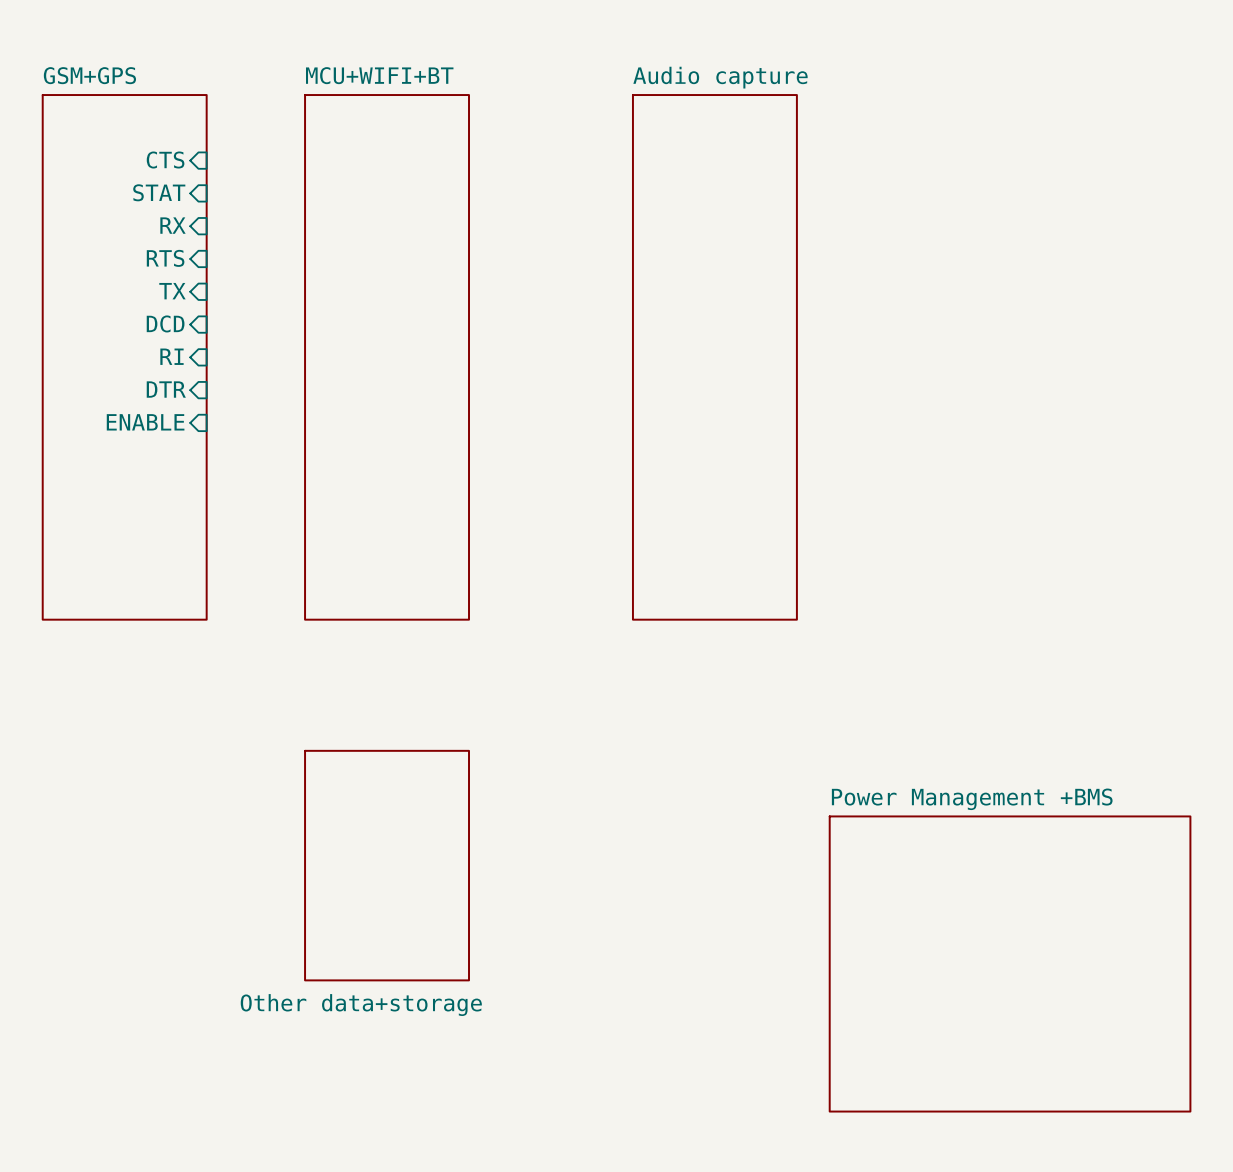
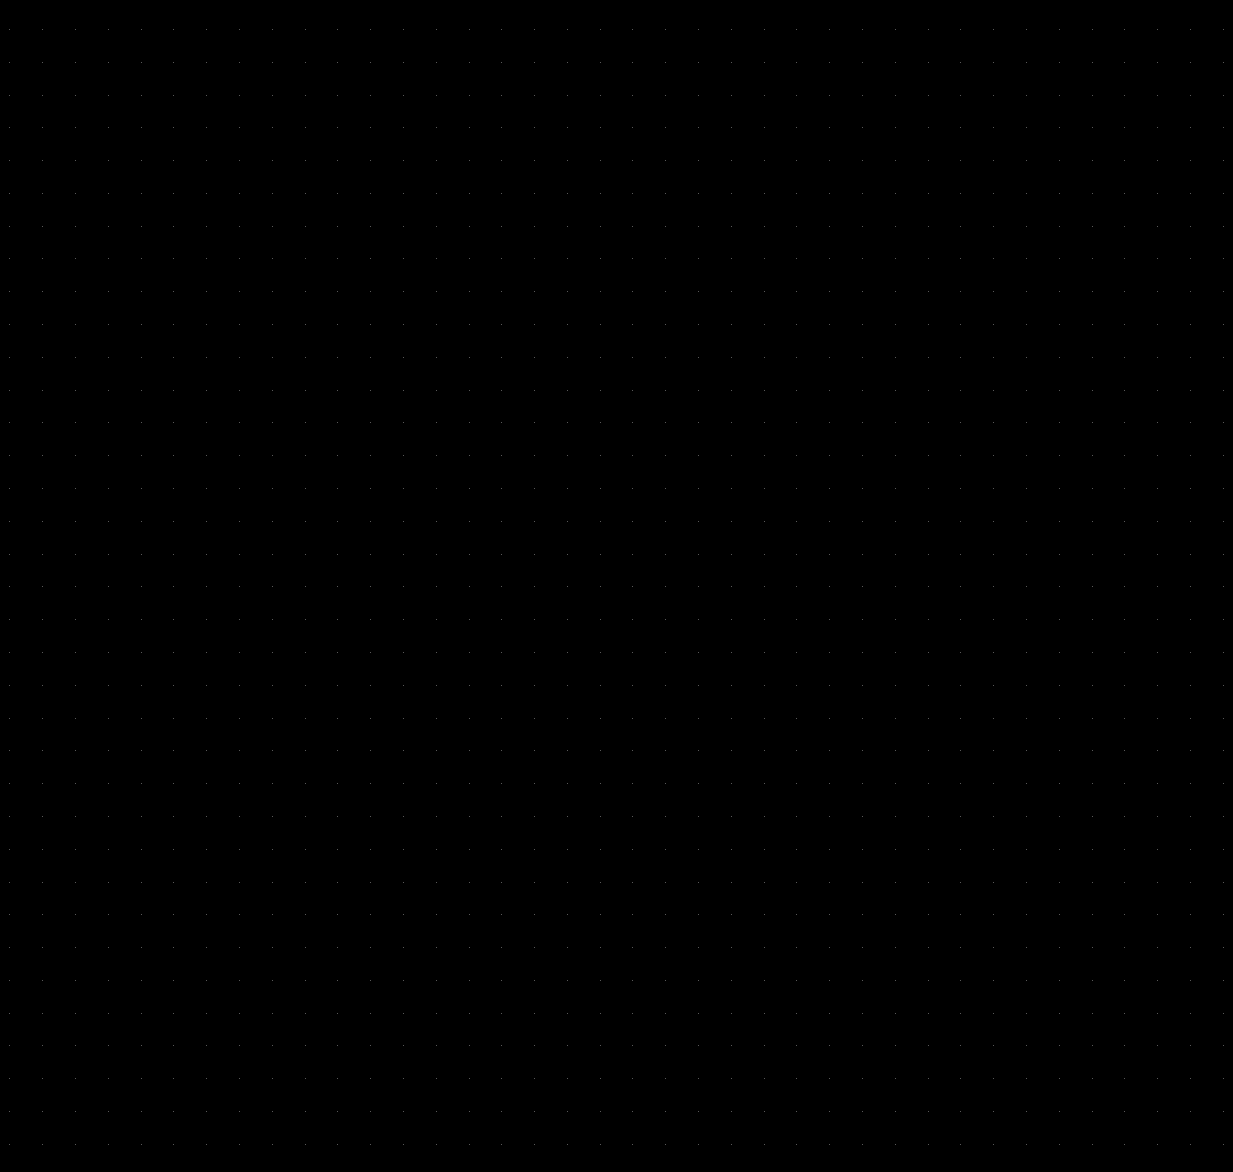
sheet pin: CTS (165, 160) -> none
sheet pin: STAT (159, 192) -> none
sheet pin: RX (172, 225) -> none
sheet pin: RTS (165, 258) -> none
sheet pin: TX (172, 291) -> none
sheet pin: DCD (165, 323) -> none
sheet pin: RI (171, 356) -> none
sheet GSM+GPS: (124, 357) -> none
sheet MCU+WIFI+BT: (387, 357) -> none
sheet Audio capture: (714, 357) -> none
sheet pin: DTR (166, 389) -> none
sheet pin: ENABLE (145, 422) -> none
sheet Other data+storage: (387, 865) -> none
sheet Power Management +BMS: (1010, 963) -> none

